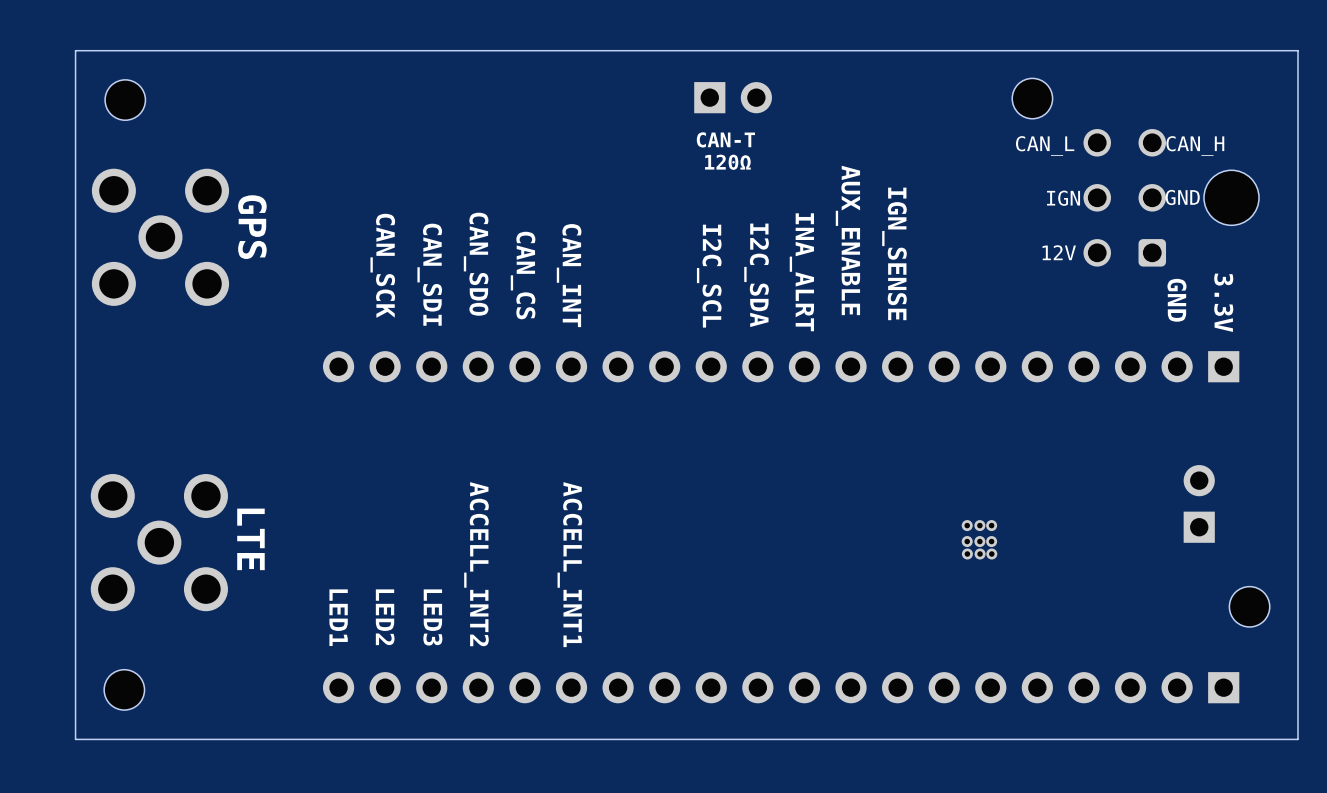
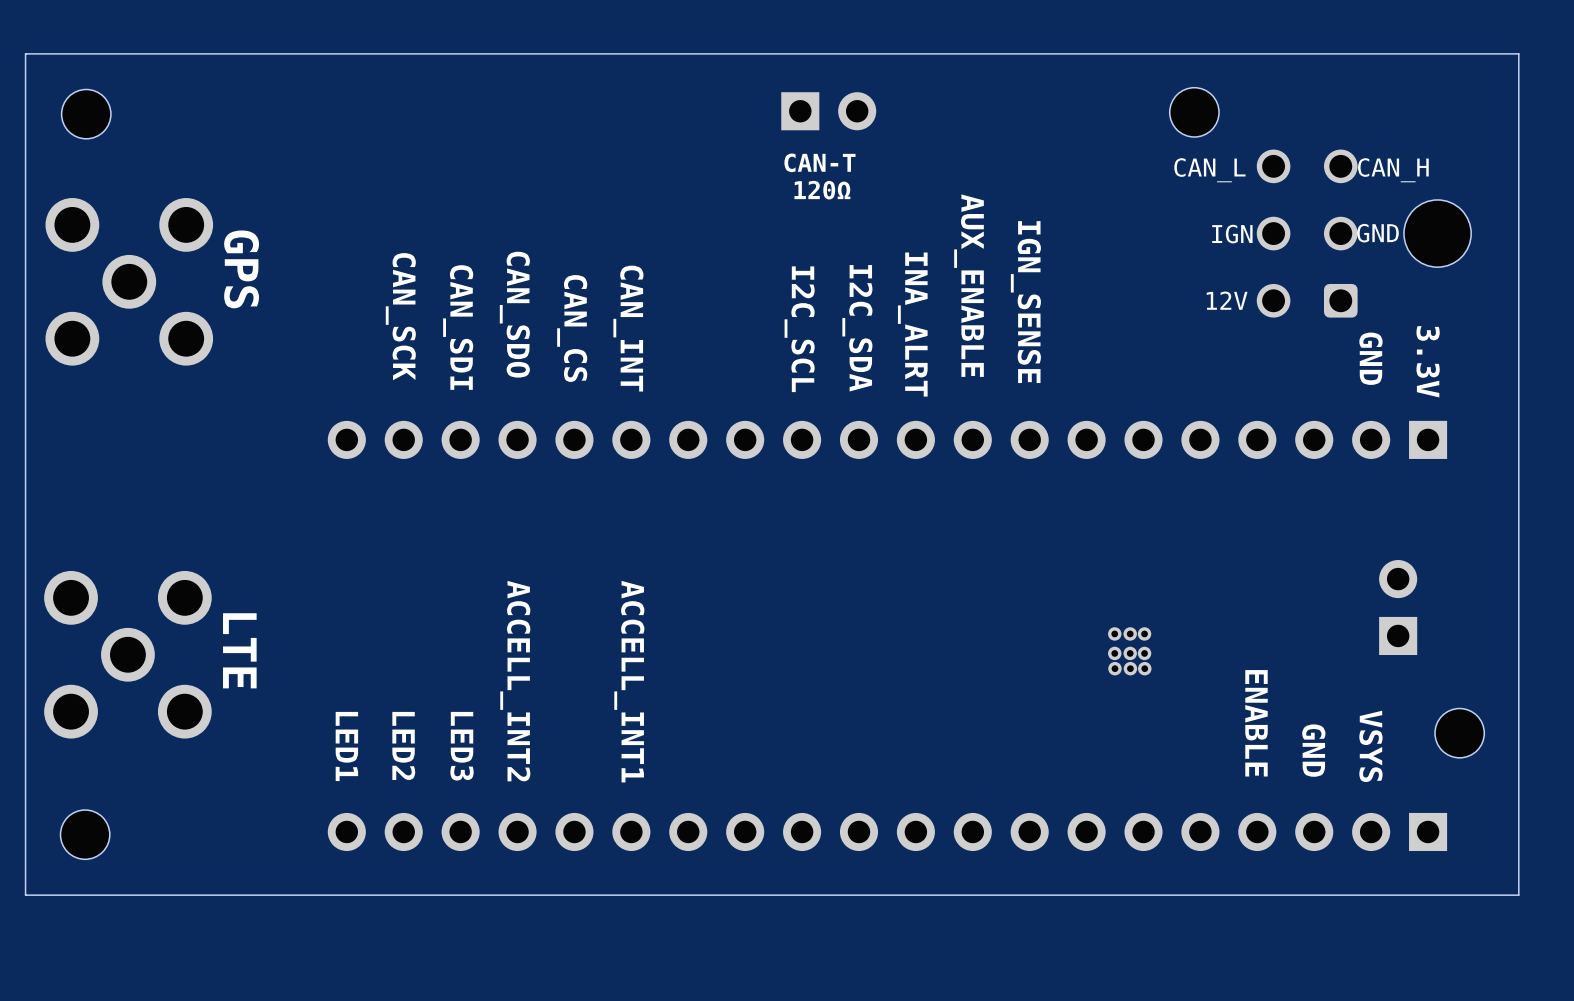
text: none -> ENABLE (1256, 723)
text: none -> VSYS (1370, 746)
text: none -> GND (1313, 750)

